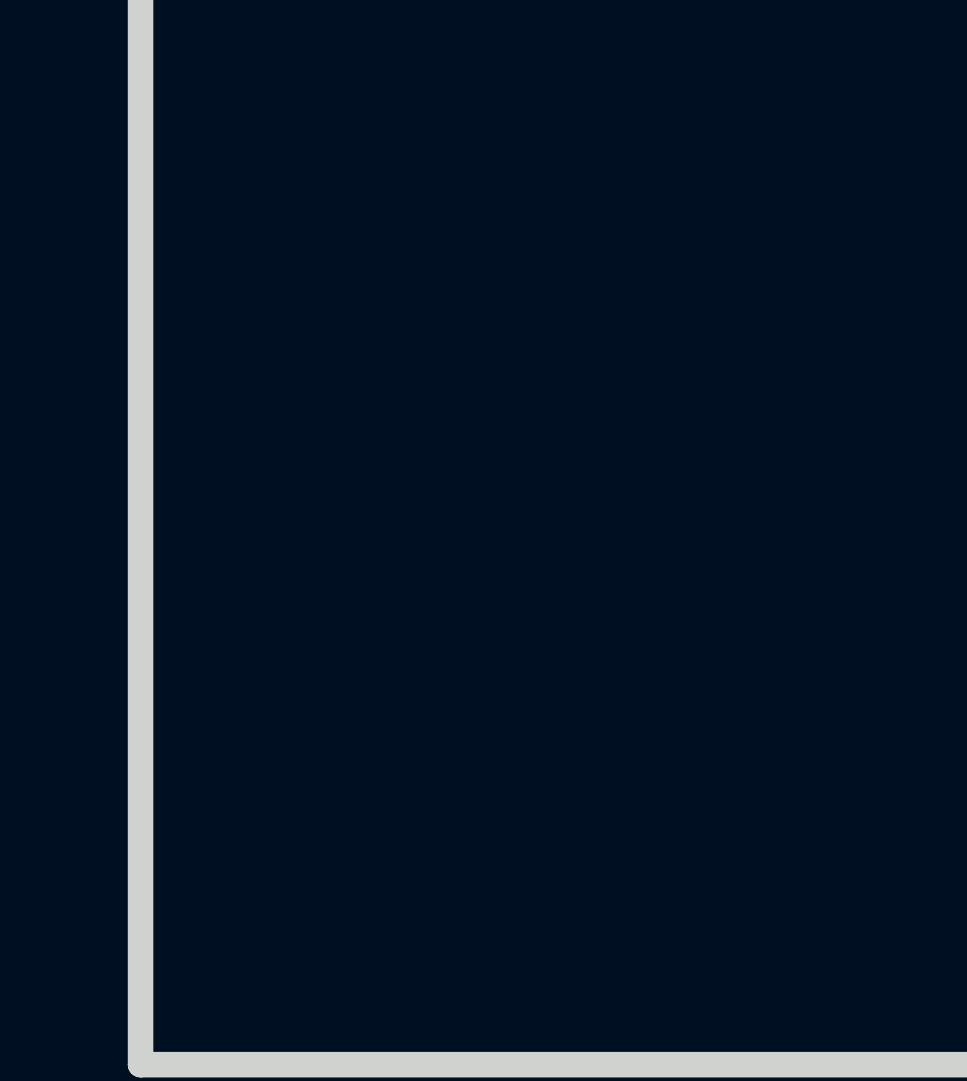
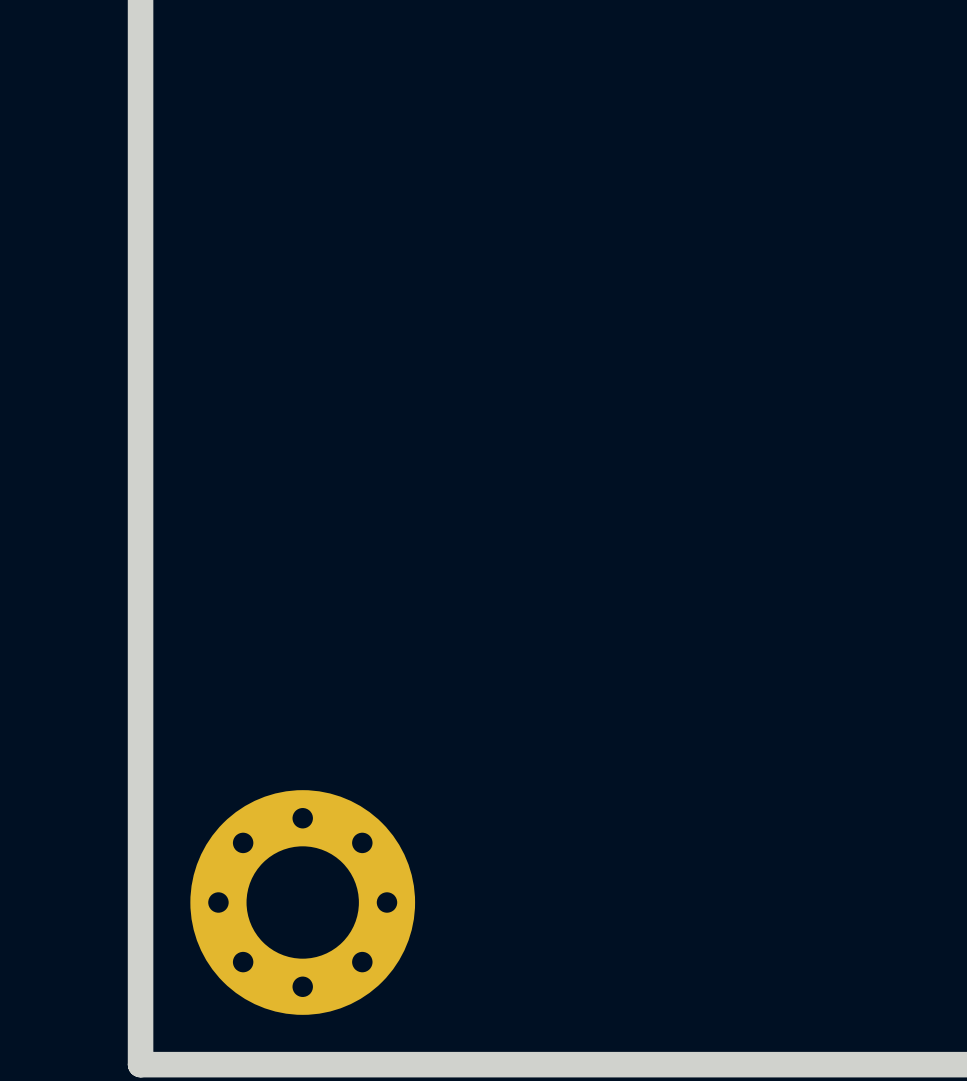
part: none -> (302, 902)

